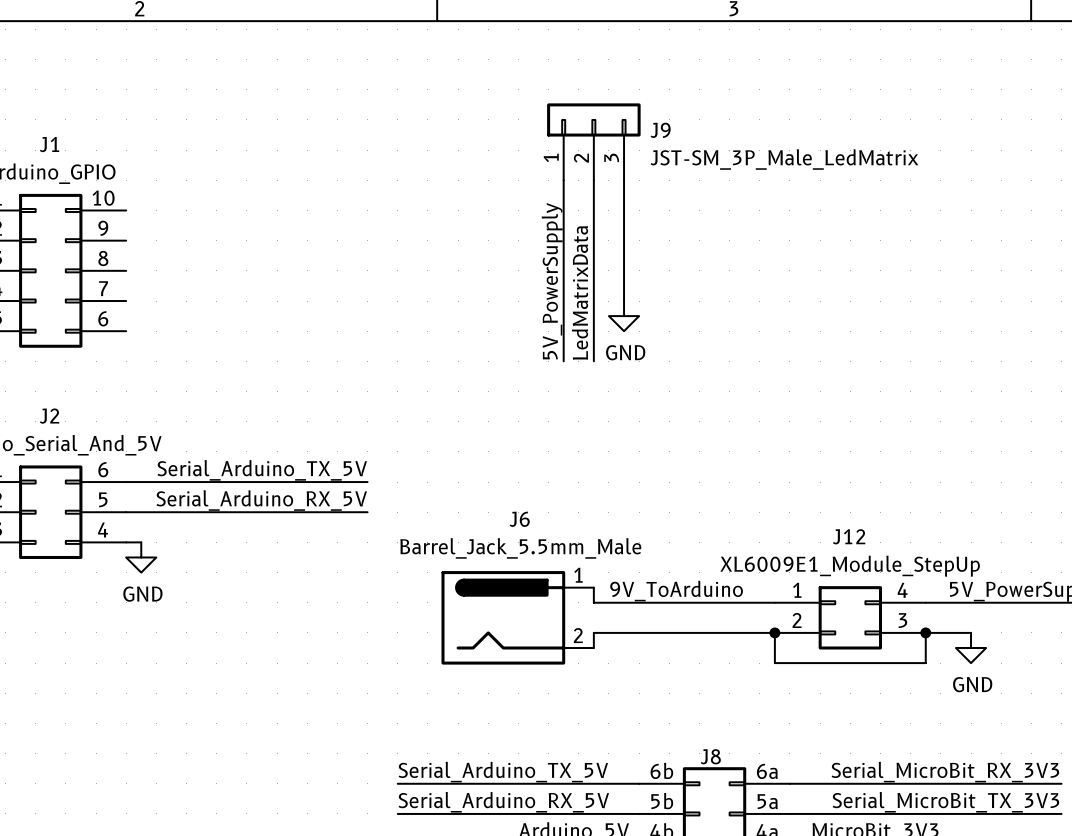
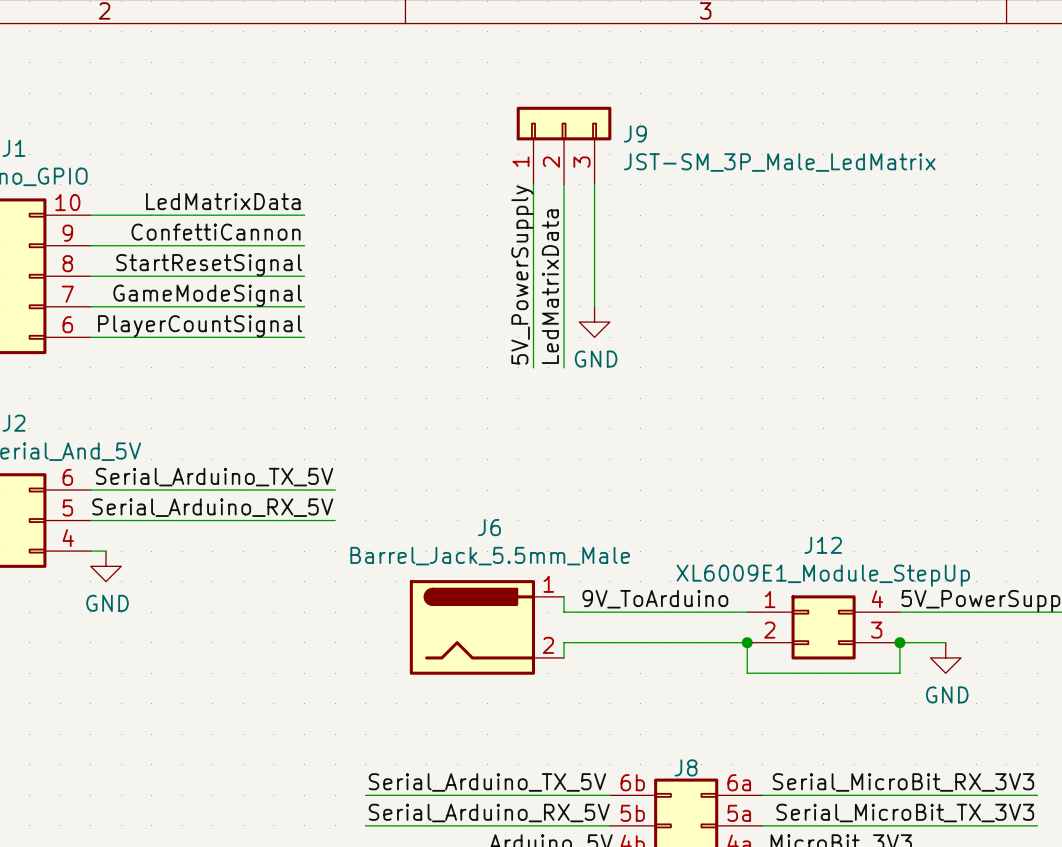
label: none -> LedMatrixData (223, 201)
wire: none -> (90, 215) (304, 215)
label: none -> ConfettiCannon (216, 232)
wire: none -> (90, 245) (304, 245)
label: none -> StartResetSignal (209, 265)
wire: none -> (90, 276) (304, 276)
label: none -> GameModeSignal (207, 295)
wire: none -> (90, 306) (304, 306)
label: none -> PlayerCountSignal (200, 326)
wire: none -> (90, 337) (304, 337)

